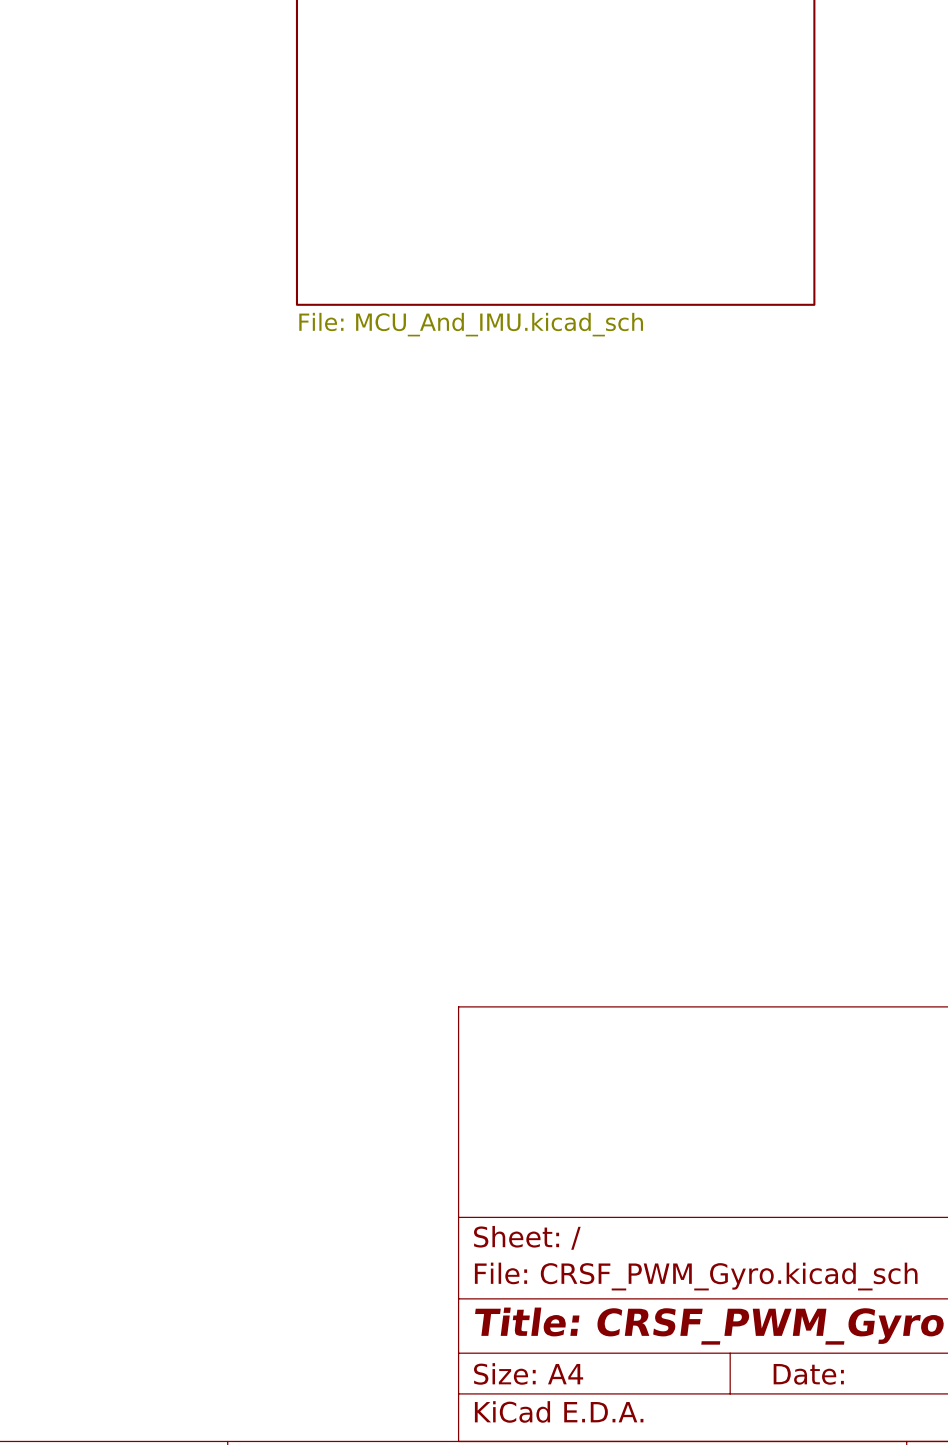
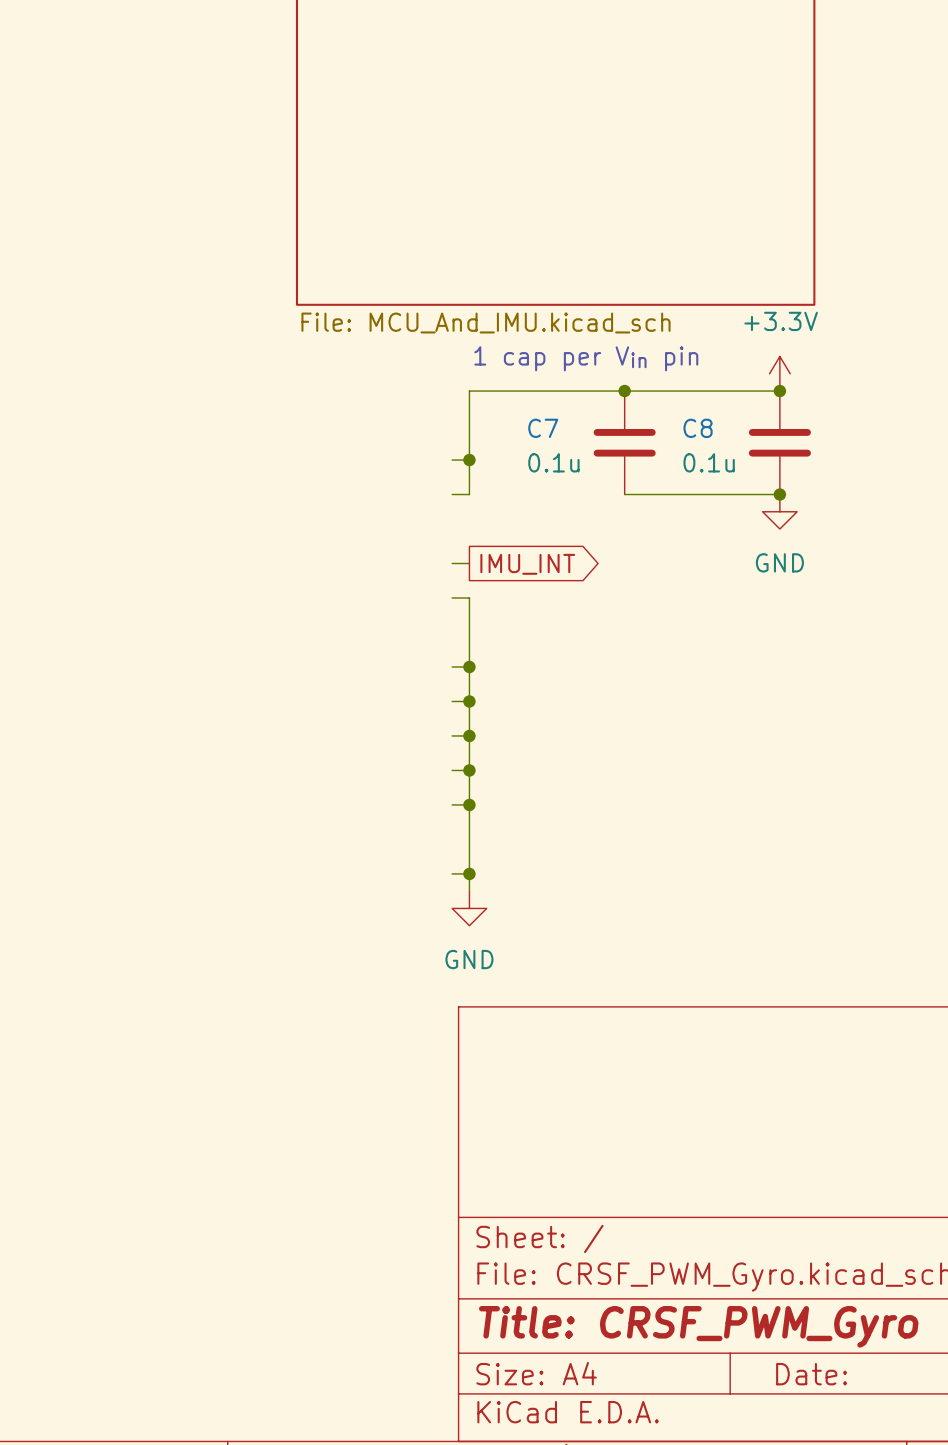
text: none -> 1 cap per Vin pin (586, 358)
power symbol: none -> +3.3V (779, 373)
junction: none -> (624, 391)
wire: none -> (779, 391) (469, 391) (469, 494) (452, 494)
junction: none -> (779, 391)
C7: none -> 0.1u (624, 442)
C8: none -> 0.1u (779, 442)
wire: none -> (452, 460) (469, 460)
junction: none -> (469, 460)
wire: none -> (624, 494) (779, 494)
junction: none -> (779, 494)
power symbol: none -> GND (779, 511)
wire: none -> (452, 563) (469, 563)
global label: none -> IMU_INT (527, 564)
wire: none -> (452, 598) (469, 598) (469, 891)
wire: none -> (452, 666) (469, 666)
junction: none -> (469, 666)
wire: none -> (452, 701) (469, 701)
junction: none -> (469, 701)
wire: none -> (452, 735) (469, 735)
junction: none -> (469, 735)
wire: none -> (452, 770) (469, 770)
junction: none -> (469, 770)
wire: none -> (452, 804) (469, 804)
junction: none -> (469, 804)
wire: none -> (452, 873) (469, 873)
junction: none -> (469, 873)
power symbol: none -> GND (469, 908)

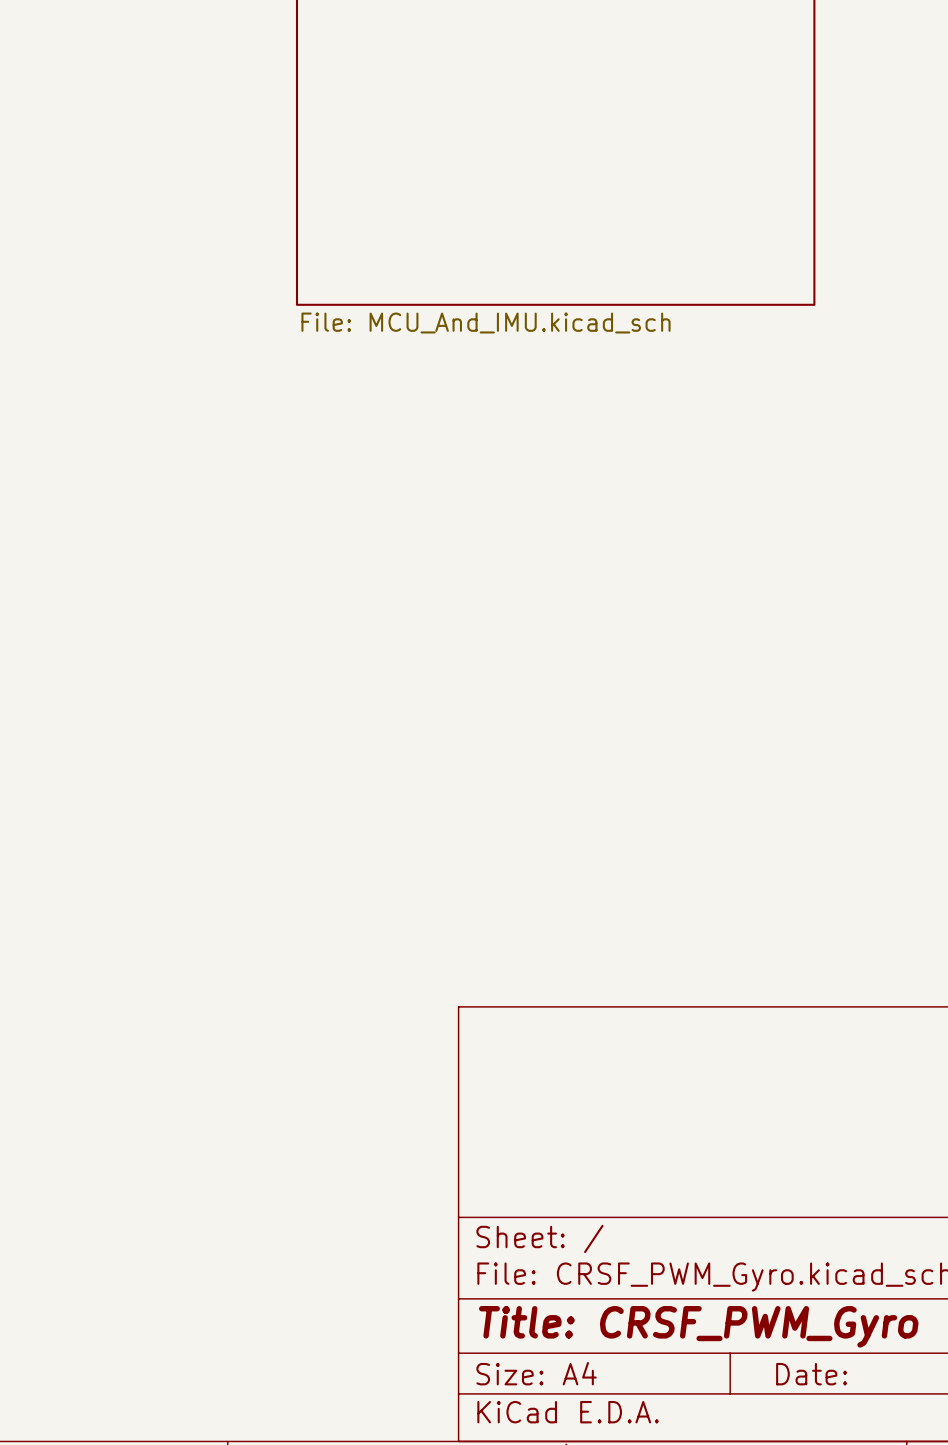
text: 1 cap per Vin pin (586, 358) -> none
power symbol: +3.3V (779, 373) -> none
junction: (624, 391) -> none
wire: (779, 391) (469, 391) (469, 494) (452, 494) -> none
junction: (779, 391) -> none
C7: 0.1u (624, 442) -> none
C8: 0.1u (779, 442) -> none
wire: (452, 460) (469, 460) -> none
junction: (469, 460) -> none
wire: (624, 494) (779, 494) -> none
junction: (779, 494) -> none
power symbol: GND (779, 511) -> none
wire: (452, 563) (469, 563) -> none
global label: IMU_INT (527, 564) -> none
wire: (452, 598) (469, 598) (469, 891) -> none
wire: (452, 666) (469, 666) -> none
junction: (469, 666) -> none
wire: (452, 701) (469, 701) -> none
junction: (469, 701) -> none
wire: (452, 735) (469, 735) -> none
junction: (469, 735) -> none
wire: (452, 770) (469, 770) -> none
junction: (469, 770) -> none
wire: (452, 804) (469, 804) -> none
junction: (469, 804) -> none
wire: (452, 873) (469, 873) -> none
junction: (469, 873) -> none
power symbol: GND (469, 908) -> none

